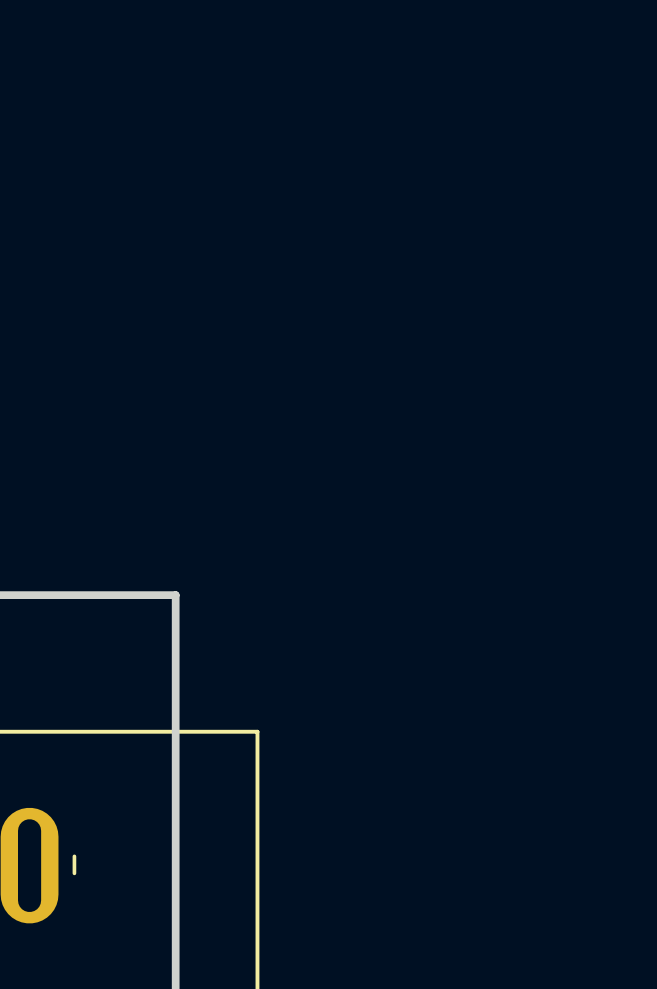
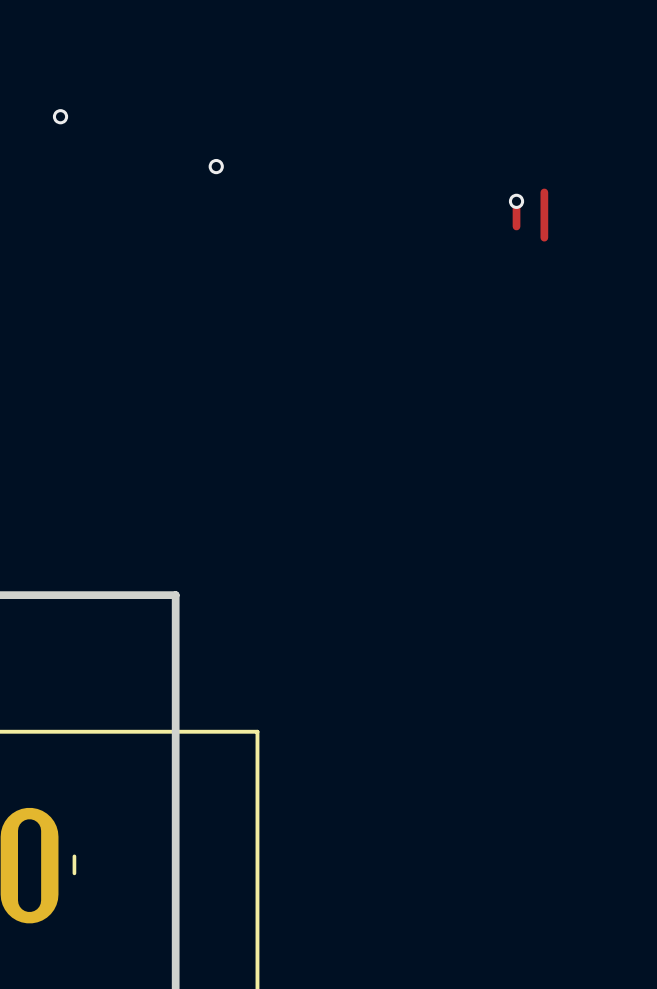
via: none -> (60, 116)
via: none -> (216, 166)
track: none -> (544, 192) (544, 237)
track: none -> (516, 201) (516, 226)
via: none -> (516, 201)

